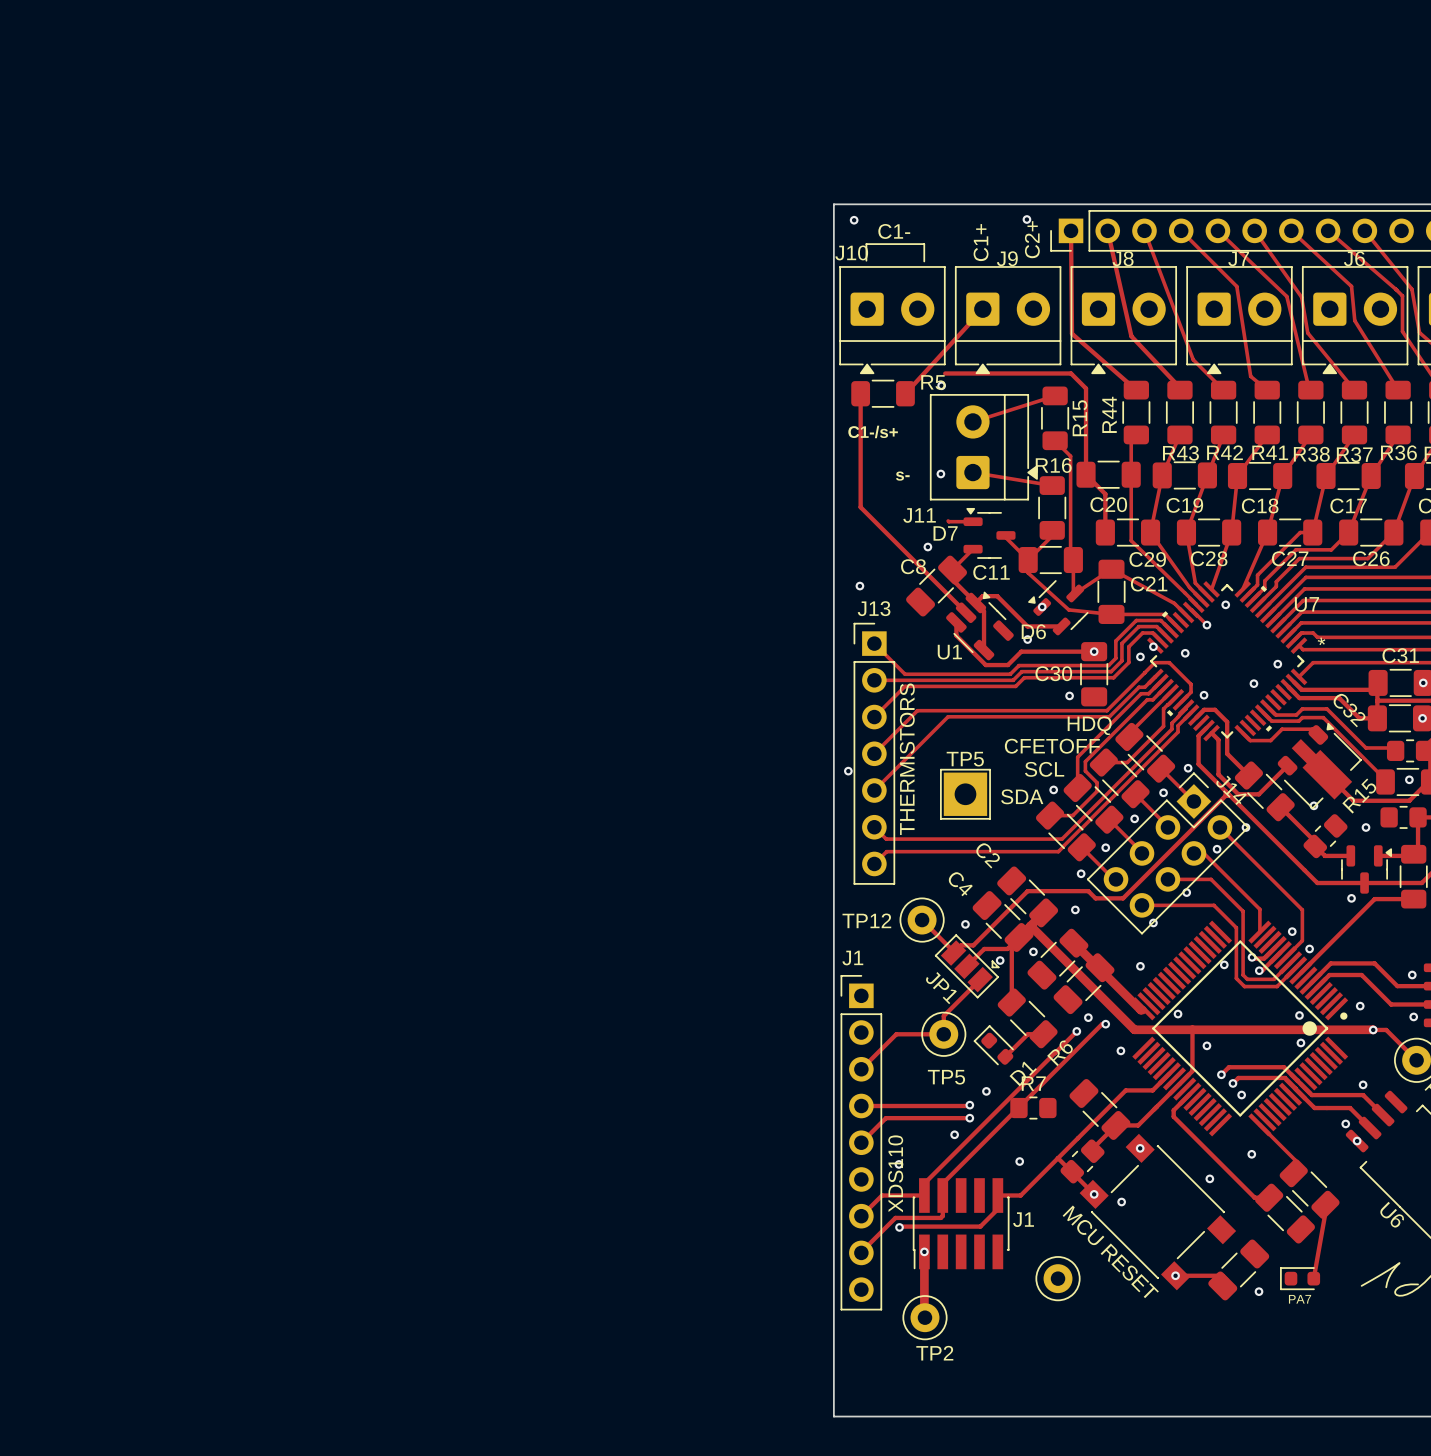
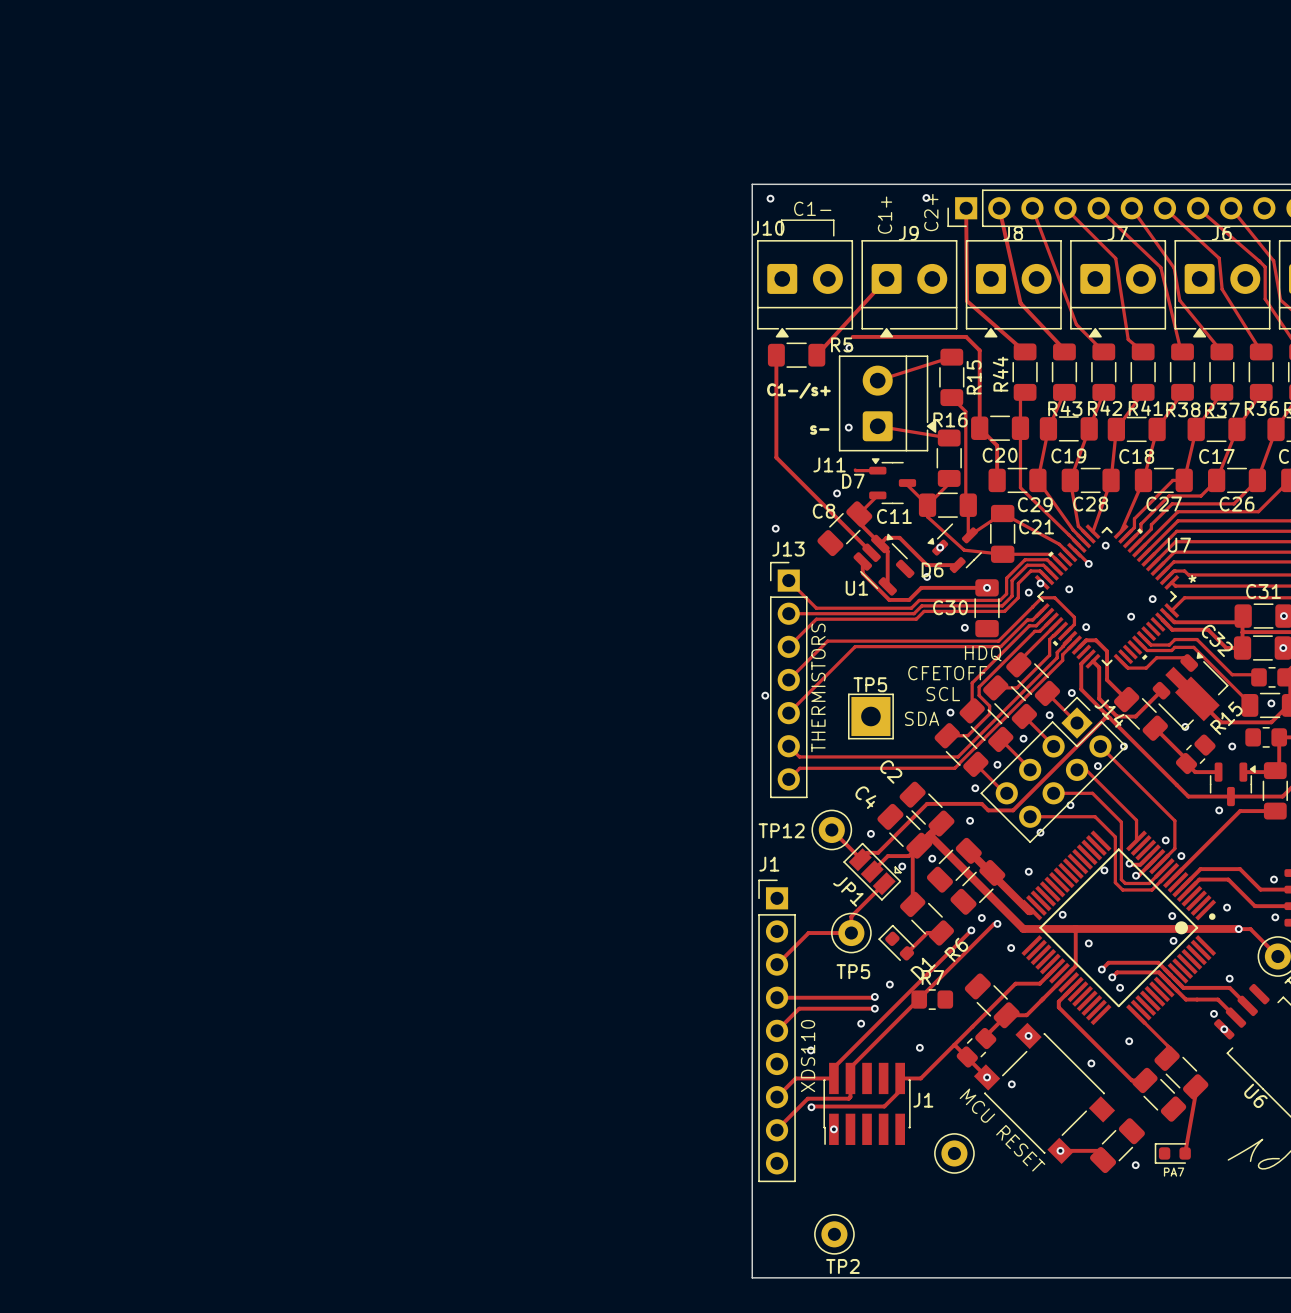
track: (924, 1251) (924, 1317) -> none
TP2 position: (924, 1317) -> (834, 1234)

